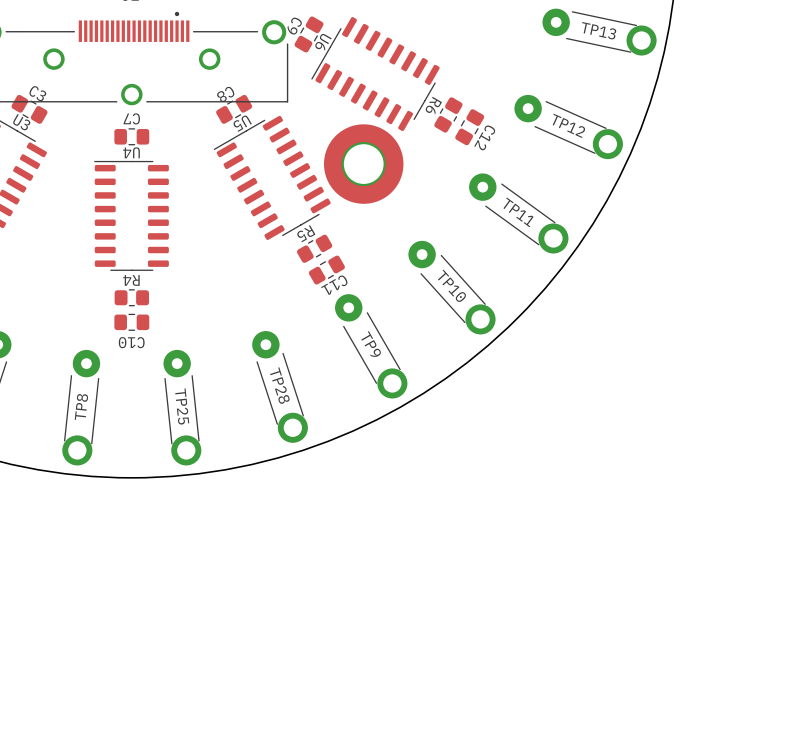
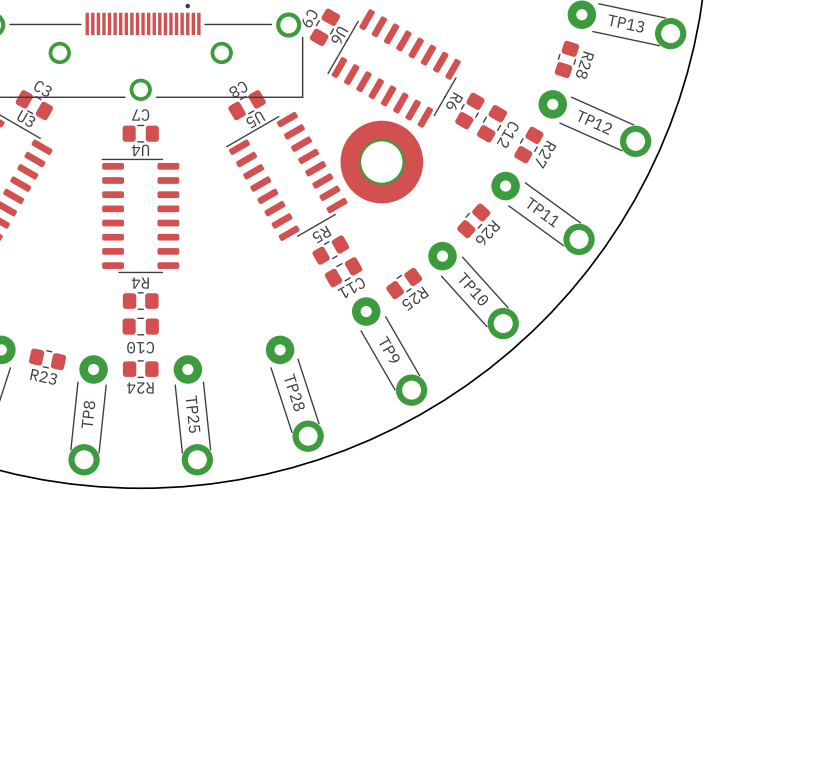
R28: none -> (566, 59)
R27: none -> (528, 145)
R26: none -> (473, 220)
R25: none -> (404, 283)
R23: none -> (47, 359)
R24: none -> (140, 369)

